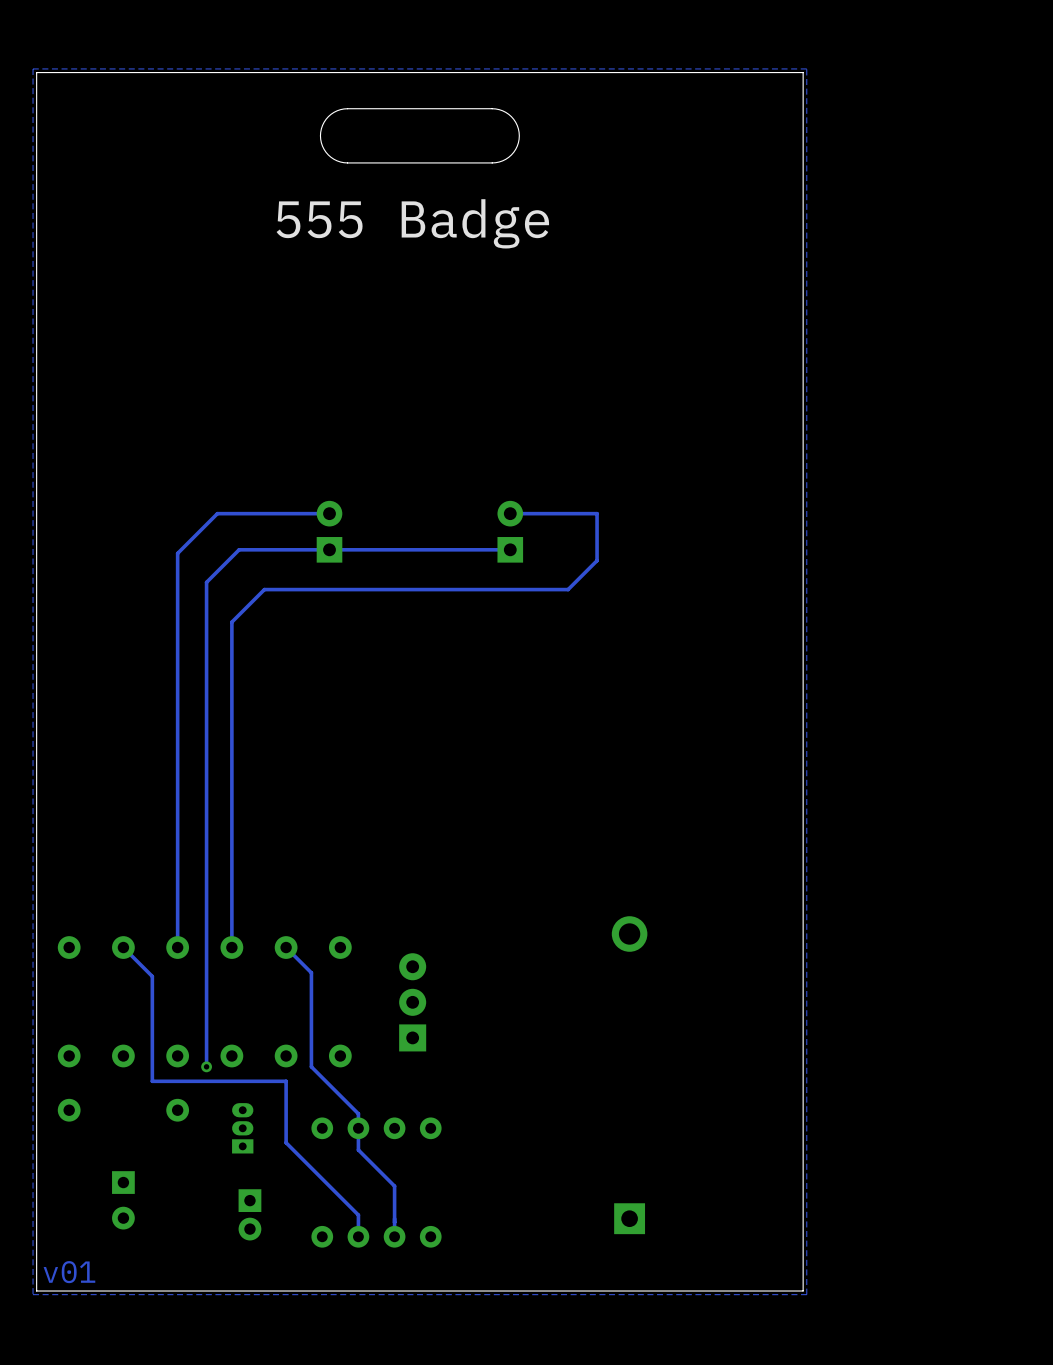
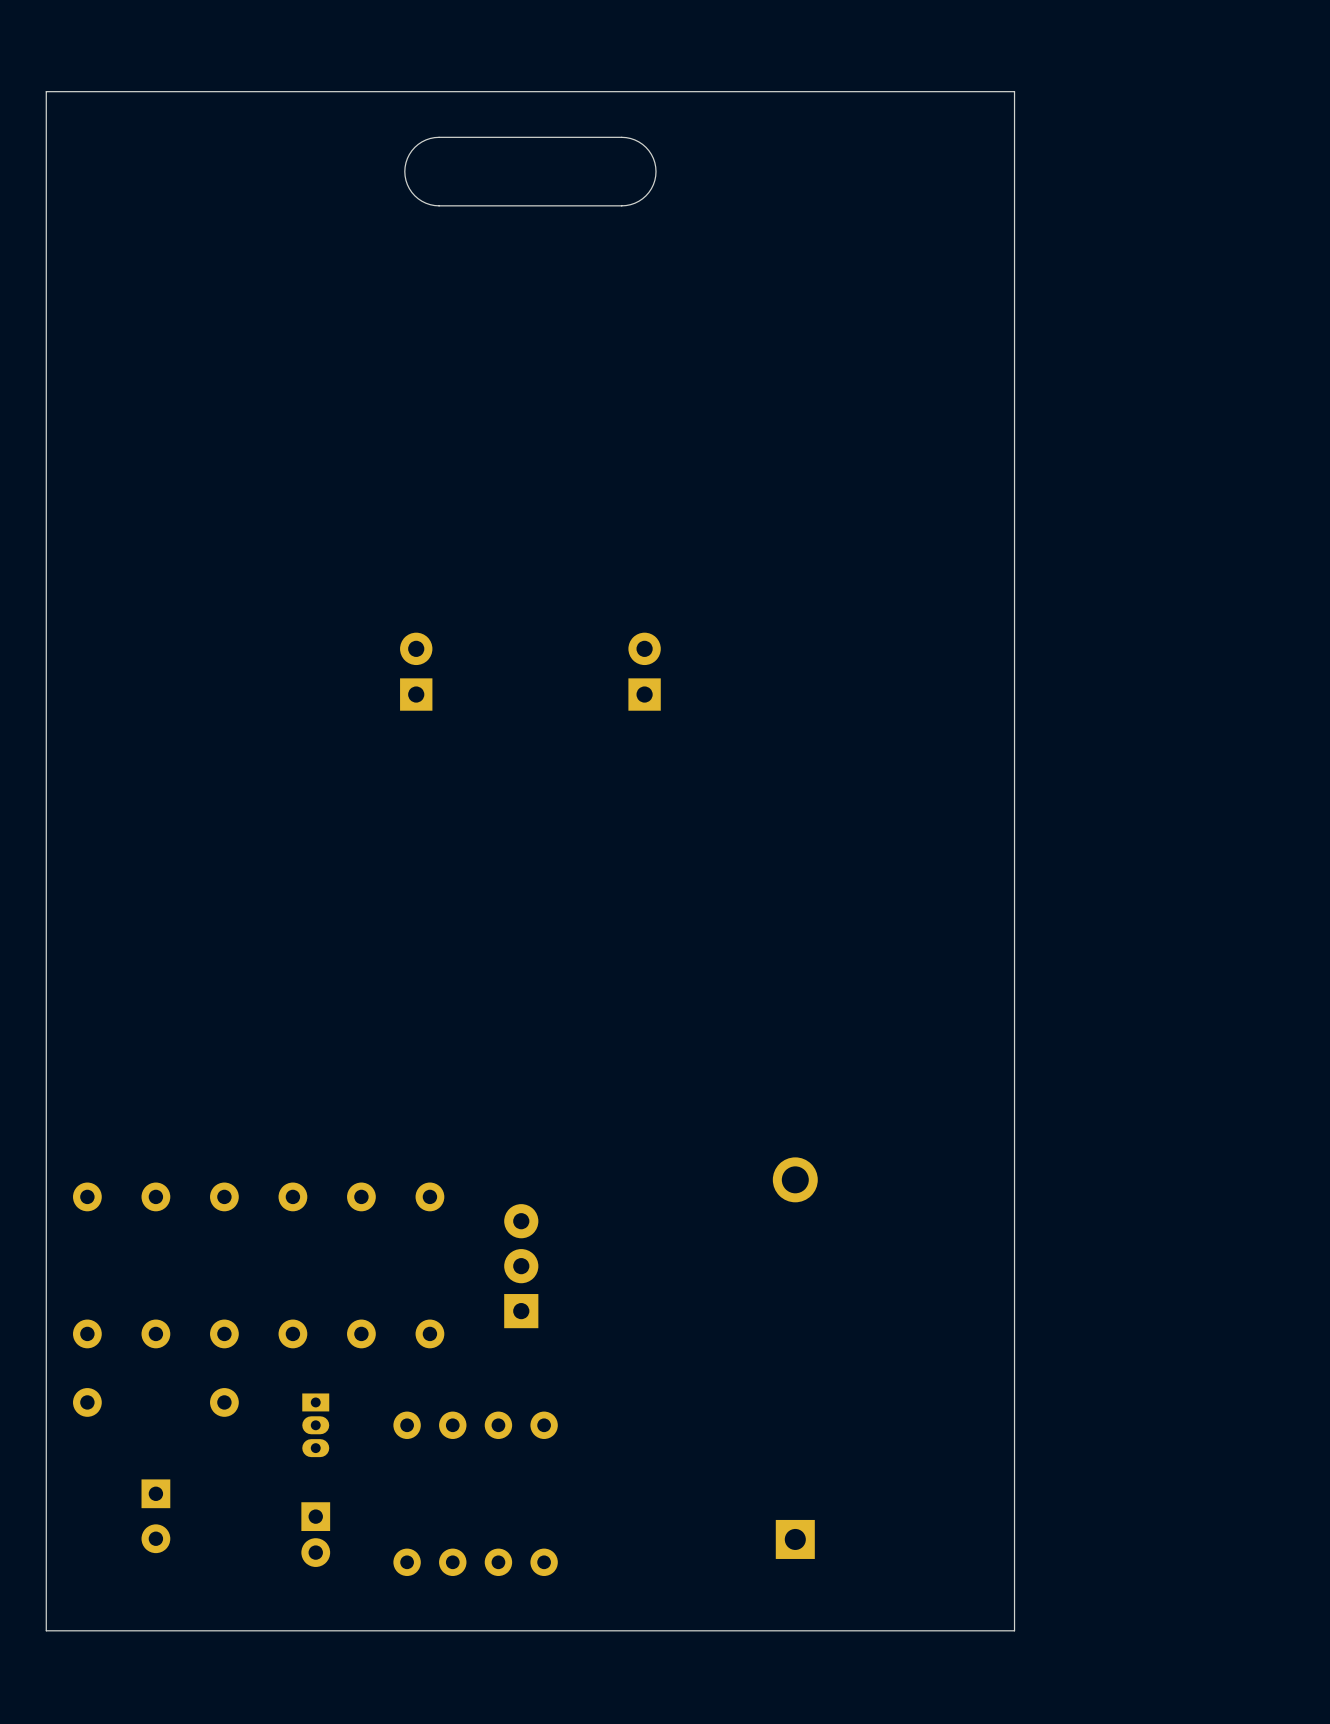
zone outline: (806, 68) (806, 1294) (33, 1294) (33, 68) (806, 68) -> none
text: 555 Badge (412, 223) -> none
track: (329, 513) (217, 513) (177, 553) (177, 947) -> none
track: (510, 513) (597, 513) (597, 560) (568, 589) (264, 589) (231, 622) (231, 947) -> none
track: (510, 549) (239, 549) (206, 582) (206, 1066) -> none
track: (123, 947) (152, 976) (152, 1081) (286, 1081) (286, 1142) (358, 1215) (358, 1236) -> none
track: (286, 947) (311, 972) (311, 1066) (358, 1113) (358, 1150) (394, 1186) (394, 1236) -> none
via: (206, 1066) -> none
part rotation: 0° (242, 1128) -> 180° (315, 1425)
text: v01 (69, 1272) -> none

